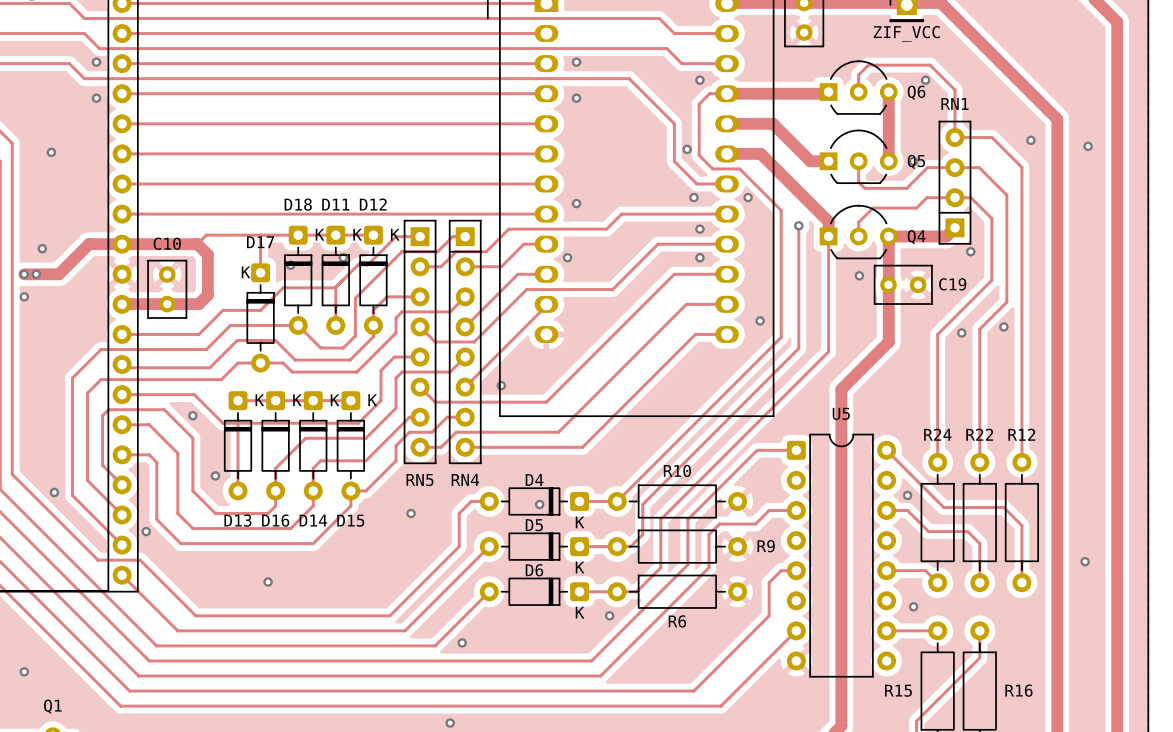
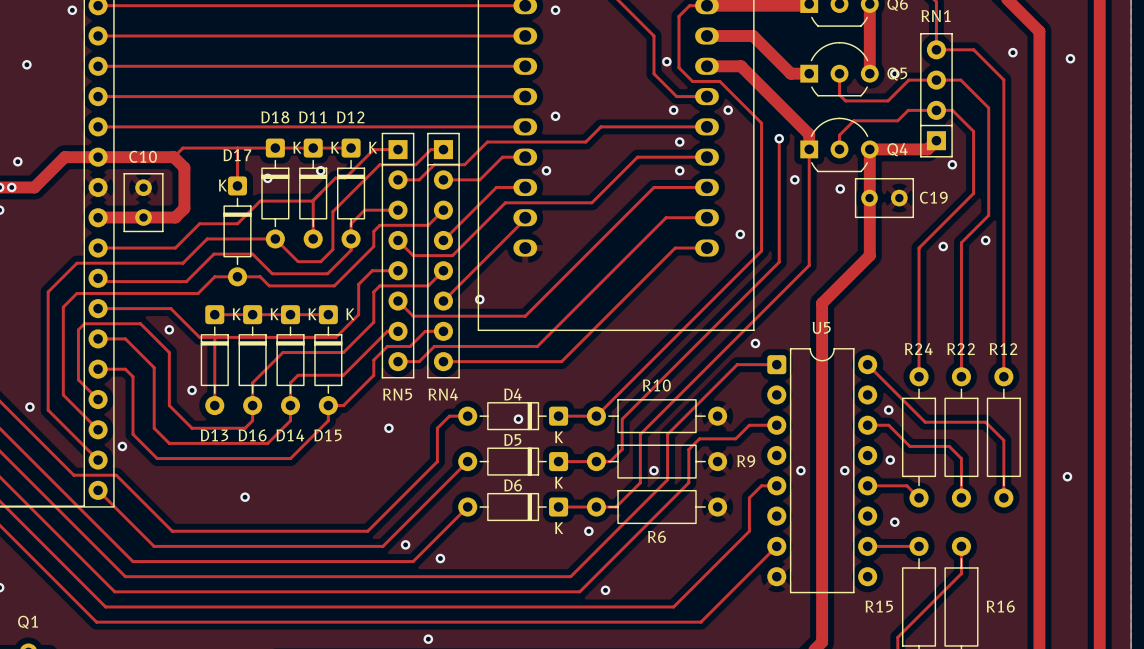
via: none -> (794, 179)
via: none -> (755, 343)
via: none -> (890, 460)
via: none -> (653, 470)
via: none -> (800, 470)
via: none -> (844, 470)
via: none -> (405, 544)
via: none -> (605, 590)

